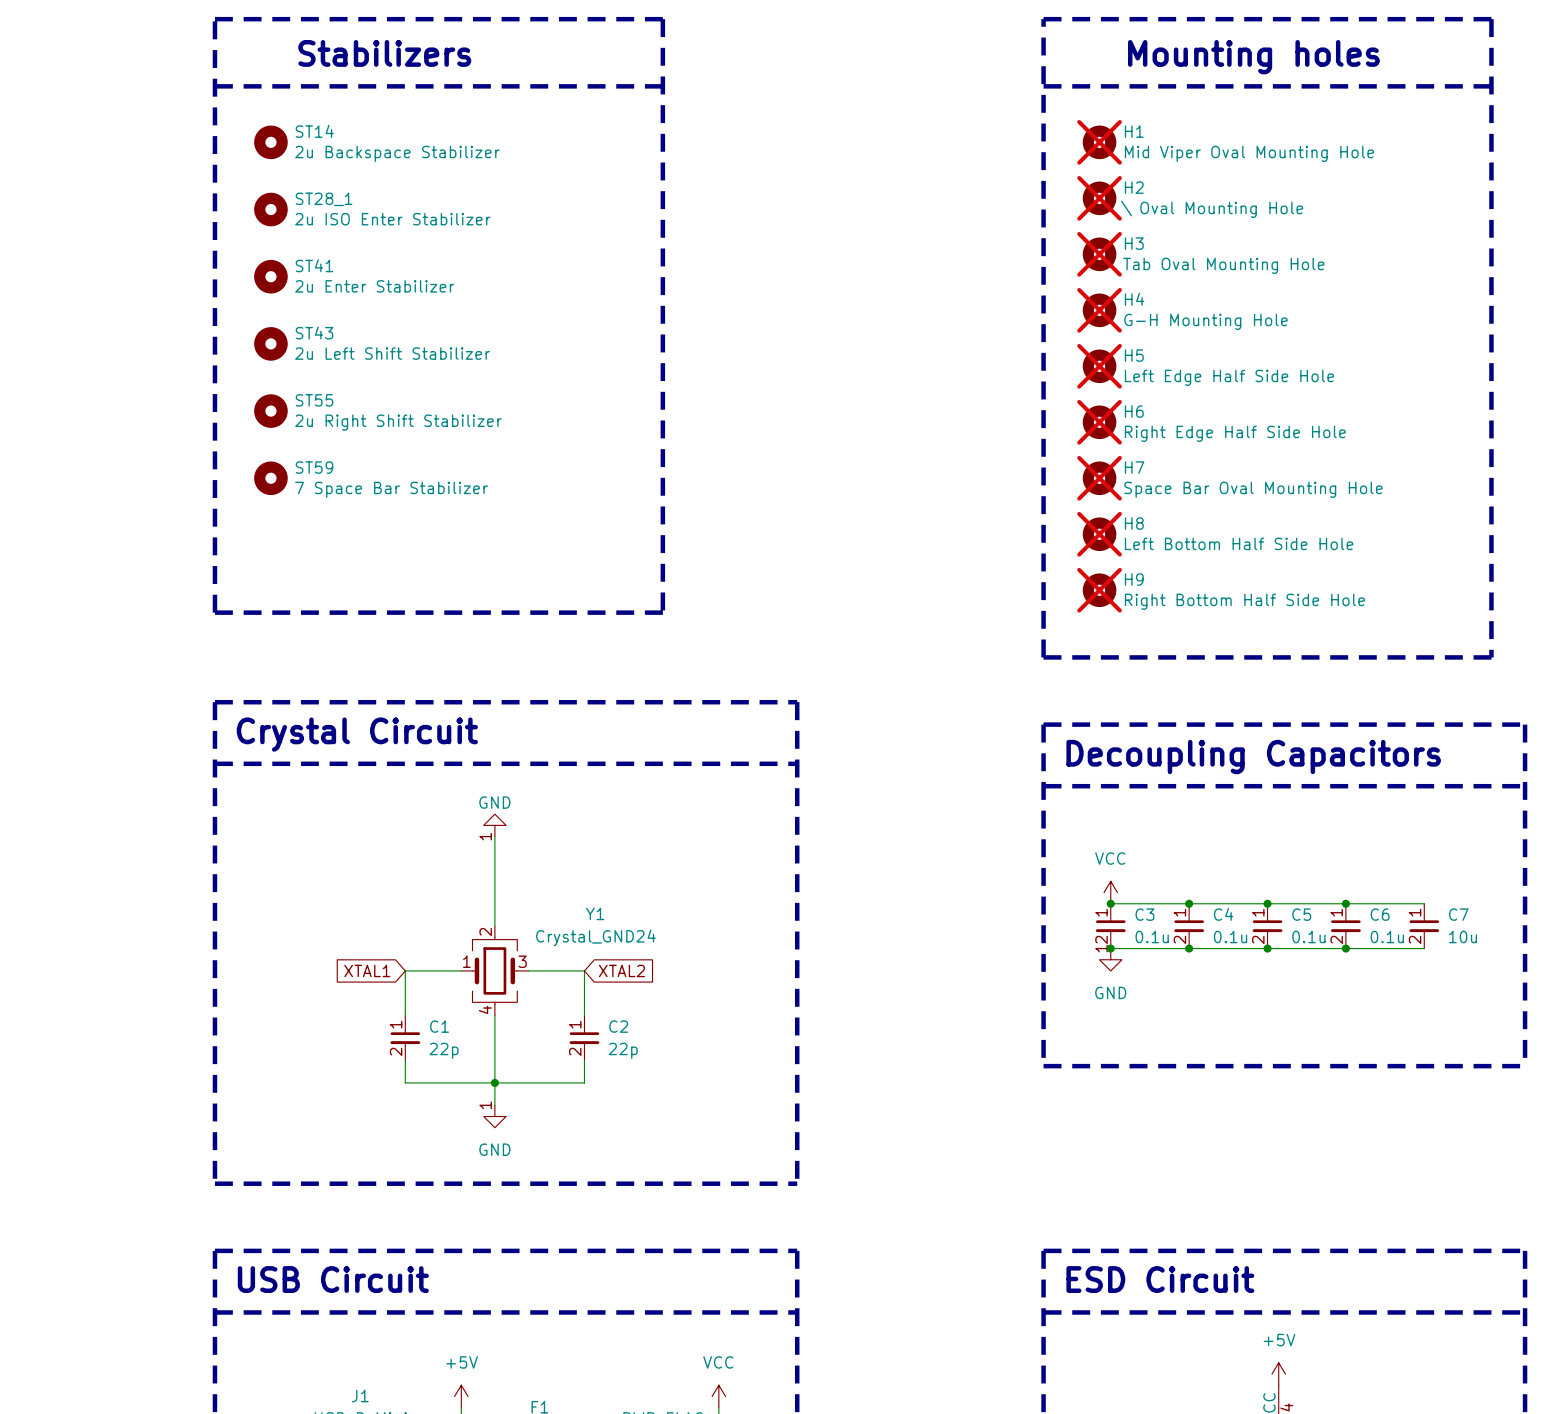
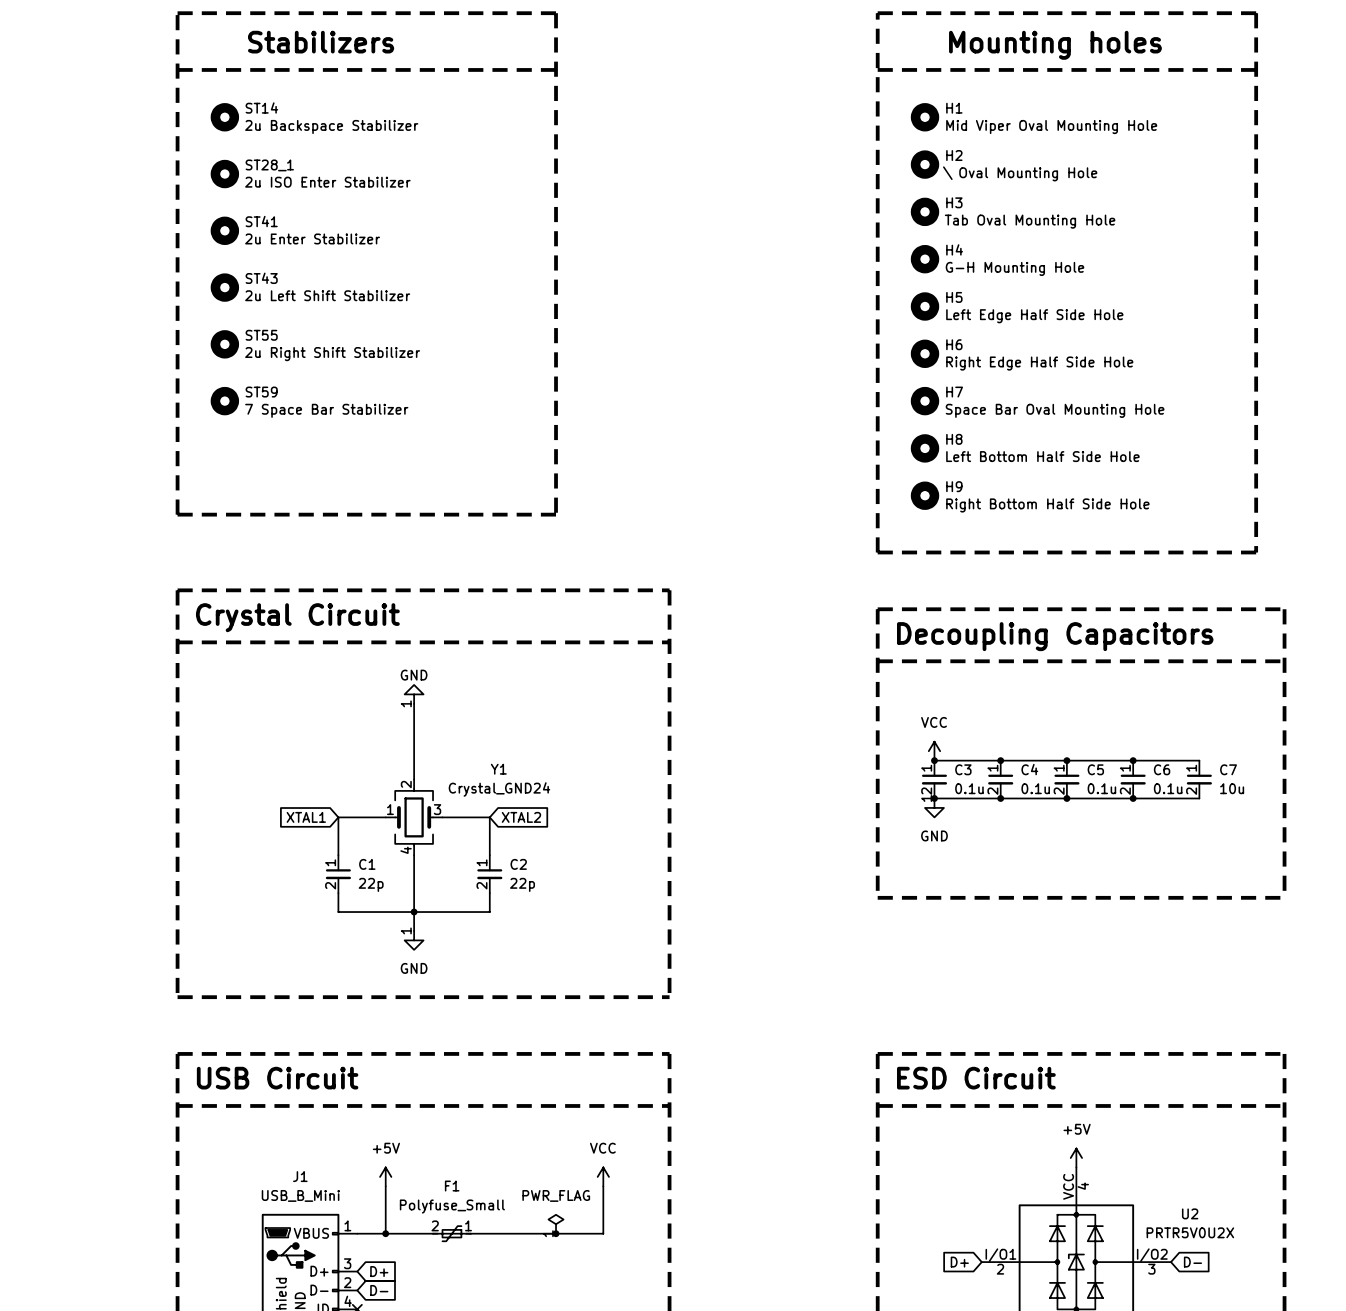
H1 do-not-place cross: (1099, 142) -> none
H2 do-not-place cross: (1099, 198) -> none
H3 do-not-place cross: (1099, 254) -> none
H4 do-not-place cross: (1099, 310) -> none
H5 do-not-place cross: (1099, 366) -> none
H6 do-not-place cross: (1099, 422) -> none
H7 do-not-place cross: (1099, 478) -> none
H8 do-not-place cross: (1099, 534) -> none
H9 do-not-place cross: (1099, 590) -> none

